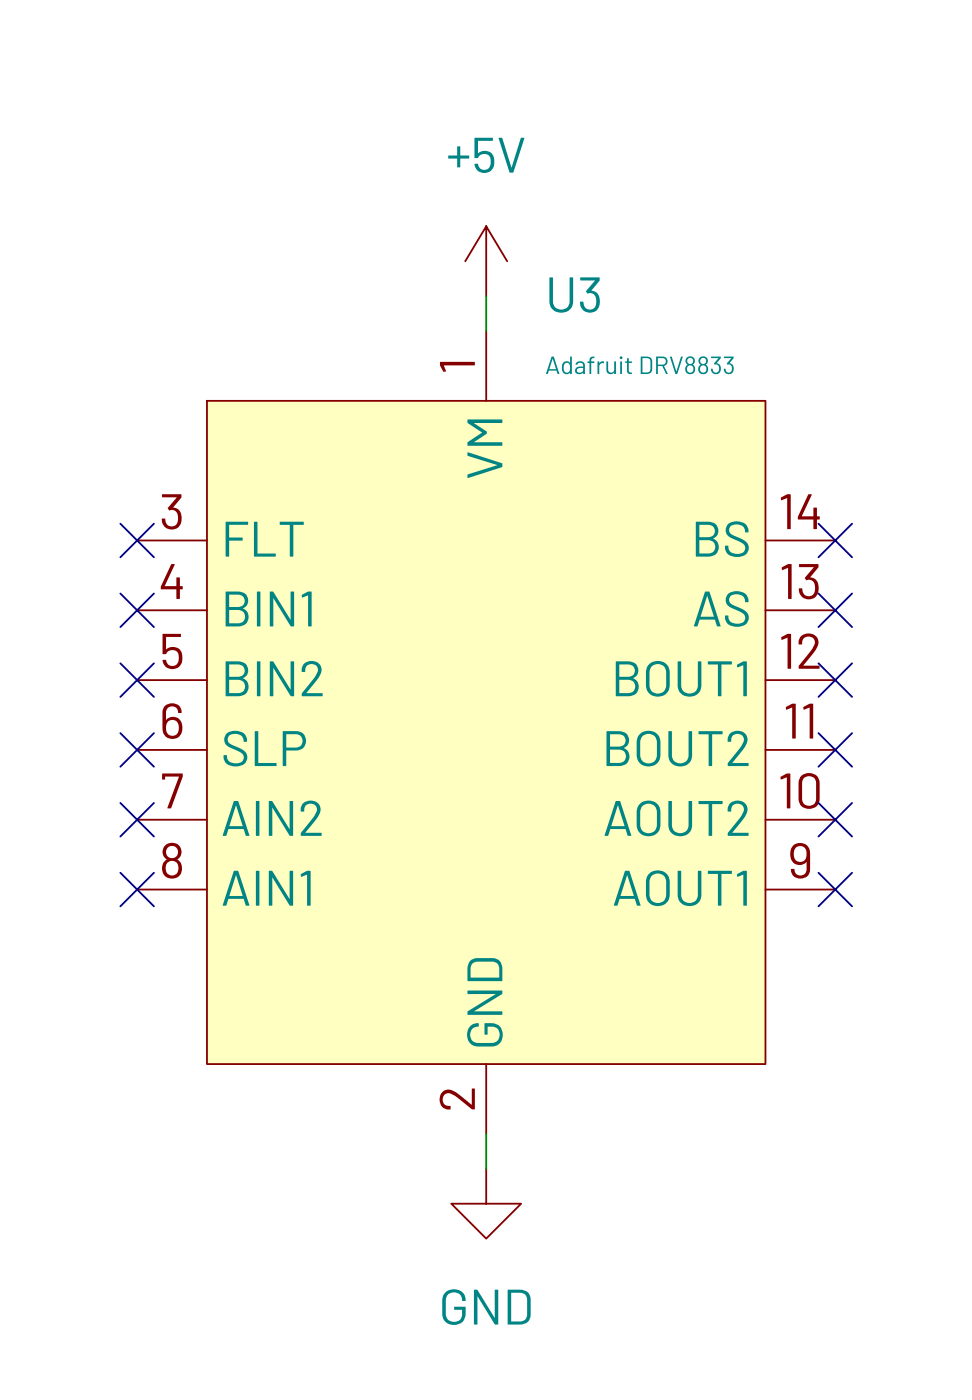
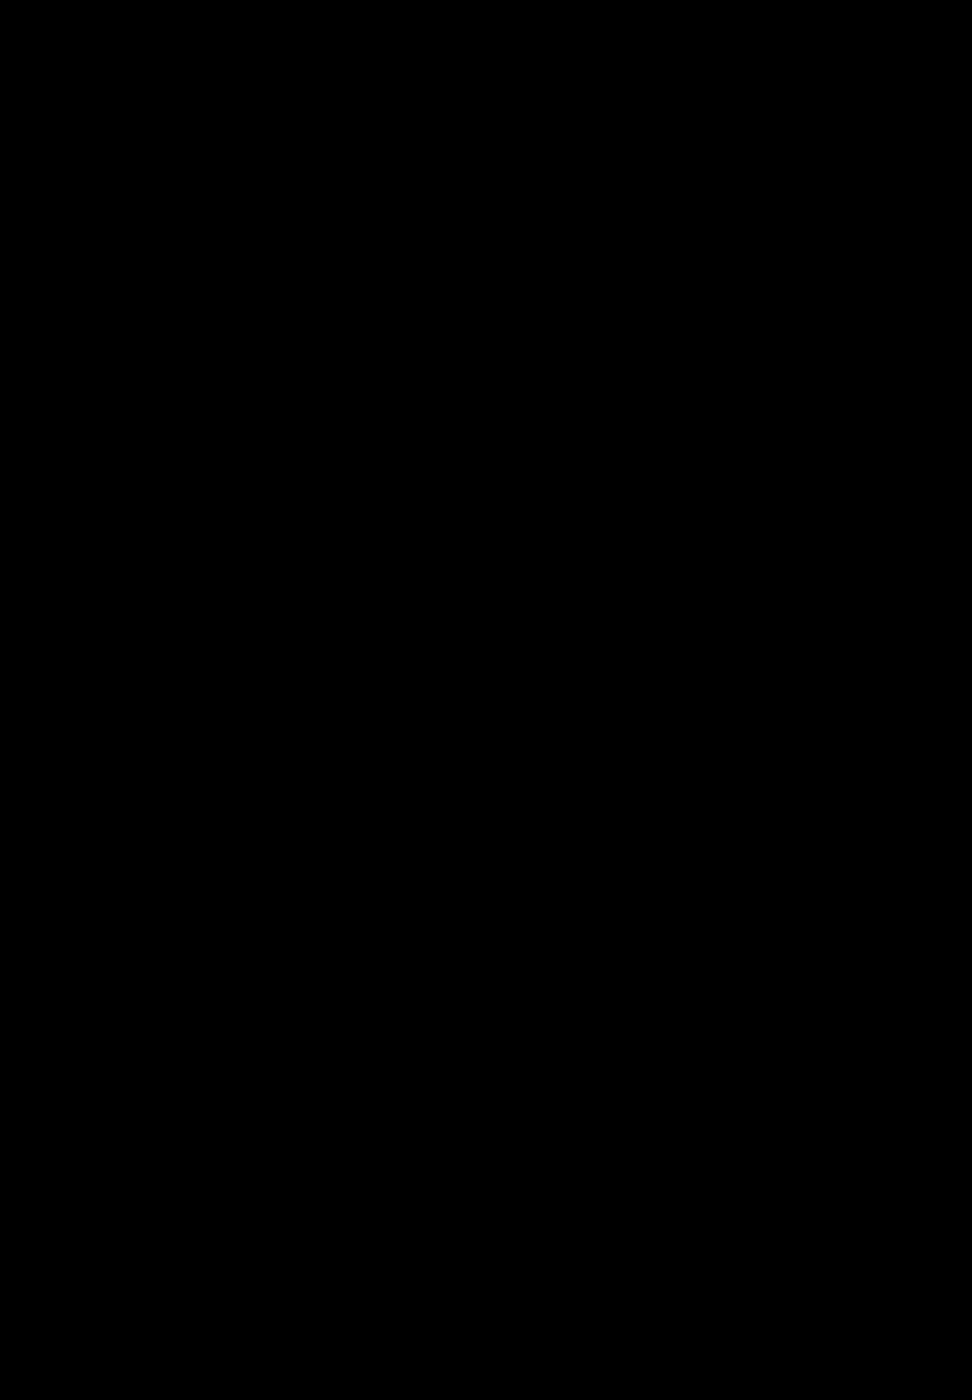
power symbol: +5V (486, 261) -> none
wire: (486, 296) (486, 331) -> none
no-connect mark: (137, 540) -> none
no-connect mark: (835, 540) -> none
no-connect mark: (137, 610) -> none
no-connect mark: (835, 610) -> none
no-connect mark: (137, 680) -> none
no-connect mark: (835, 680) -> none
U3: Adafruit DRV8833 (486, 732) -> none
no-connect mark: (137, 749) -> none
no-connect mark: (835, 749) -> none
no-connect mark: (137, 819) -> none
no-connect mark: (835, 819) -> none
no-connect mark: (137, 889) -> none
no-connect mark: (835, 889) -> none
wire: (486, 1133) (486, 1168) -> none
power symbol: GND (486, 1203) -> none

